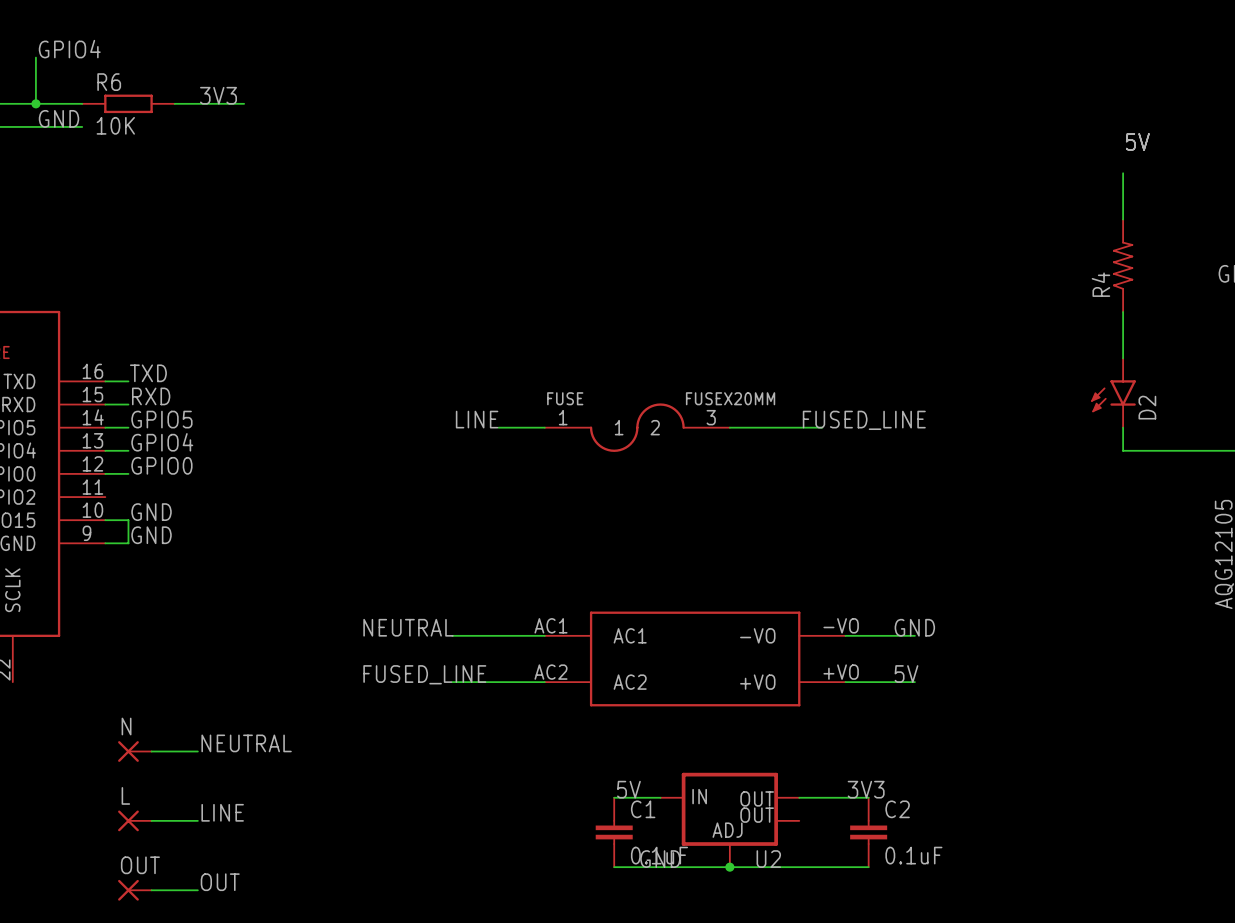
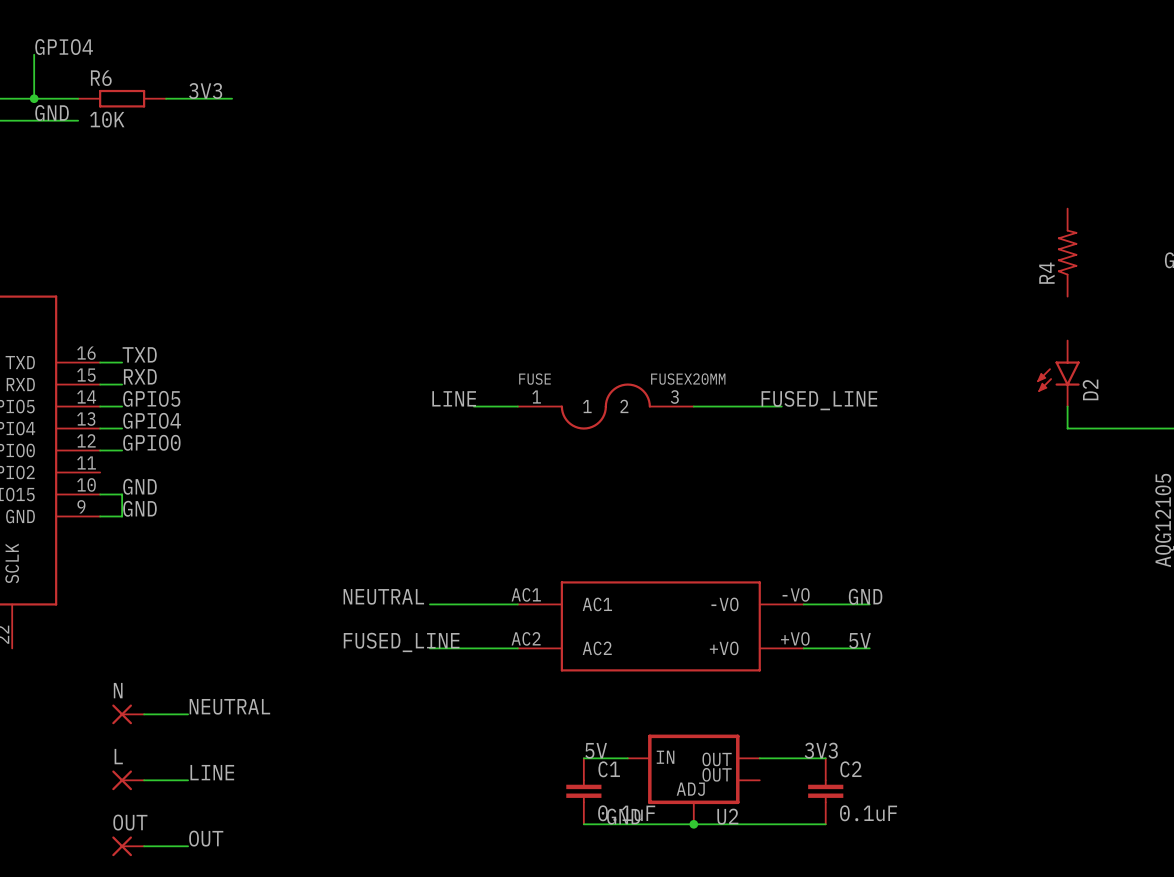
label: 5V (1137, 142) -> none
wire: (1123, 173) (1123, 219) -> none
wire: (1123, 312) (1123, 358) -> none

